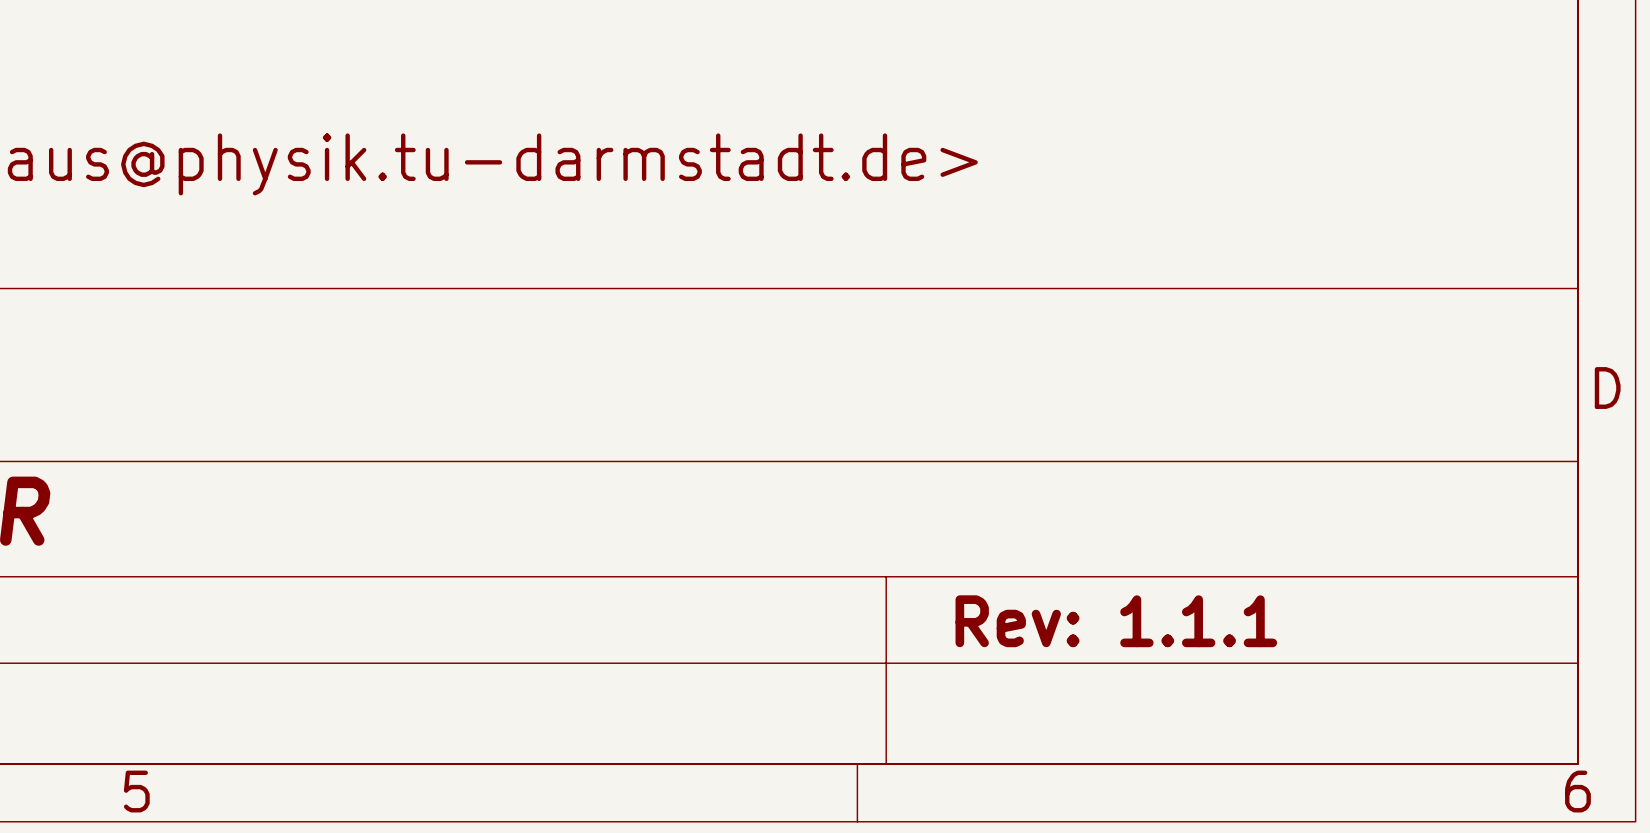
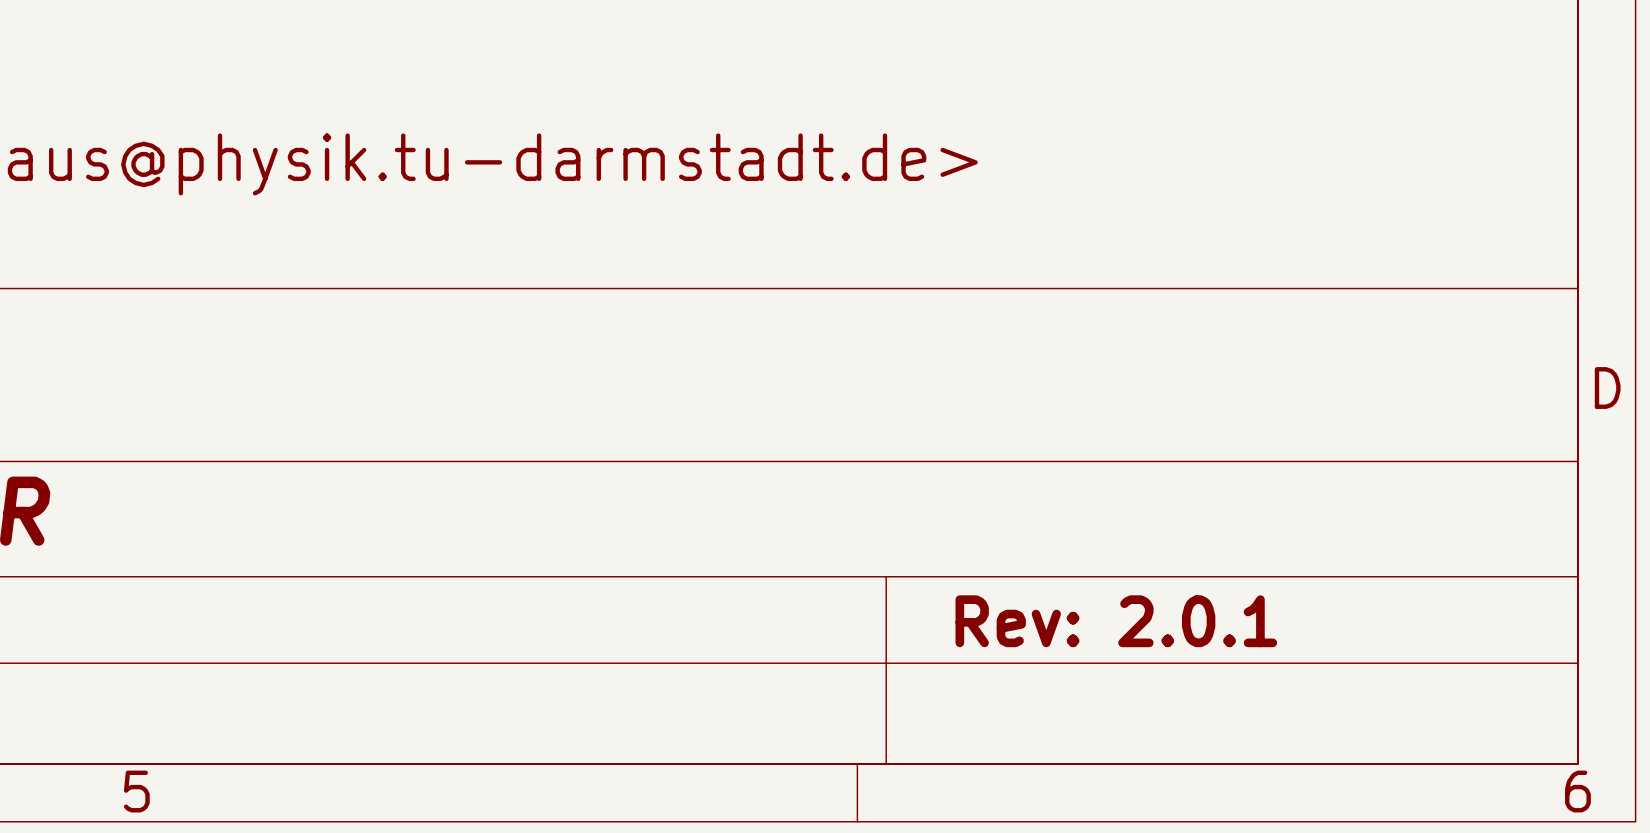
title block: Rev: 1.1.1 (1116, 621) -> Rev: 2.0.1 (1116, 621)

